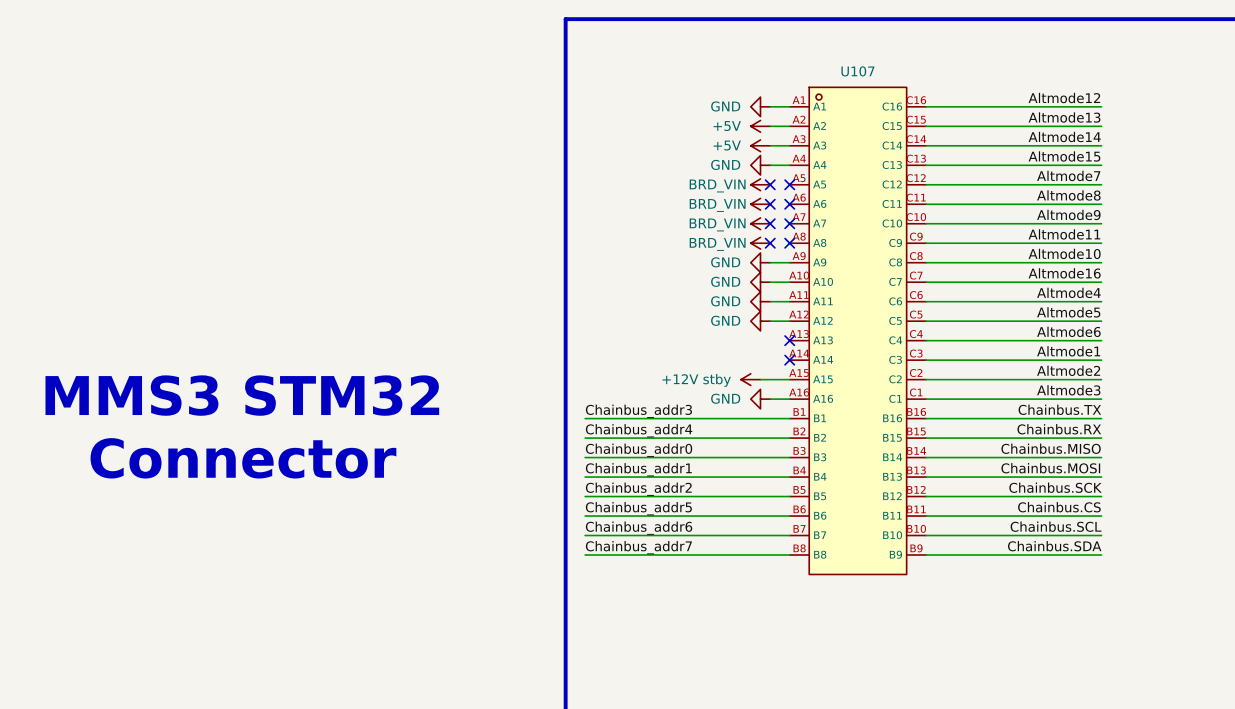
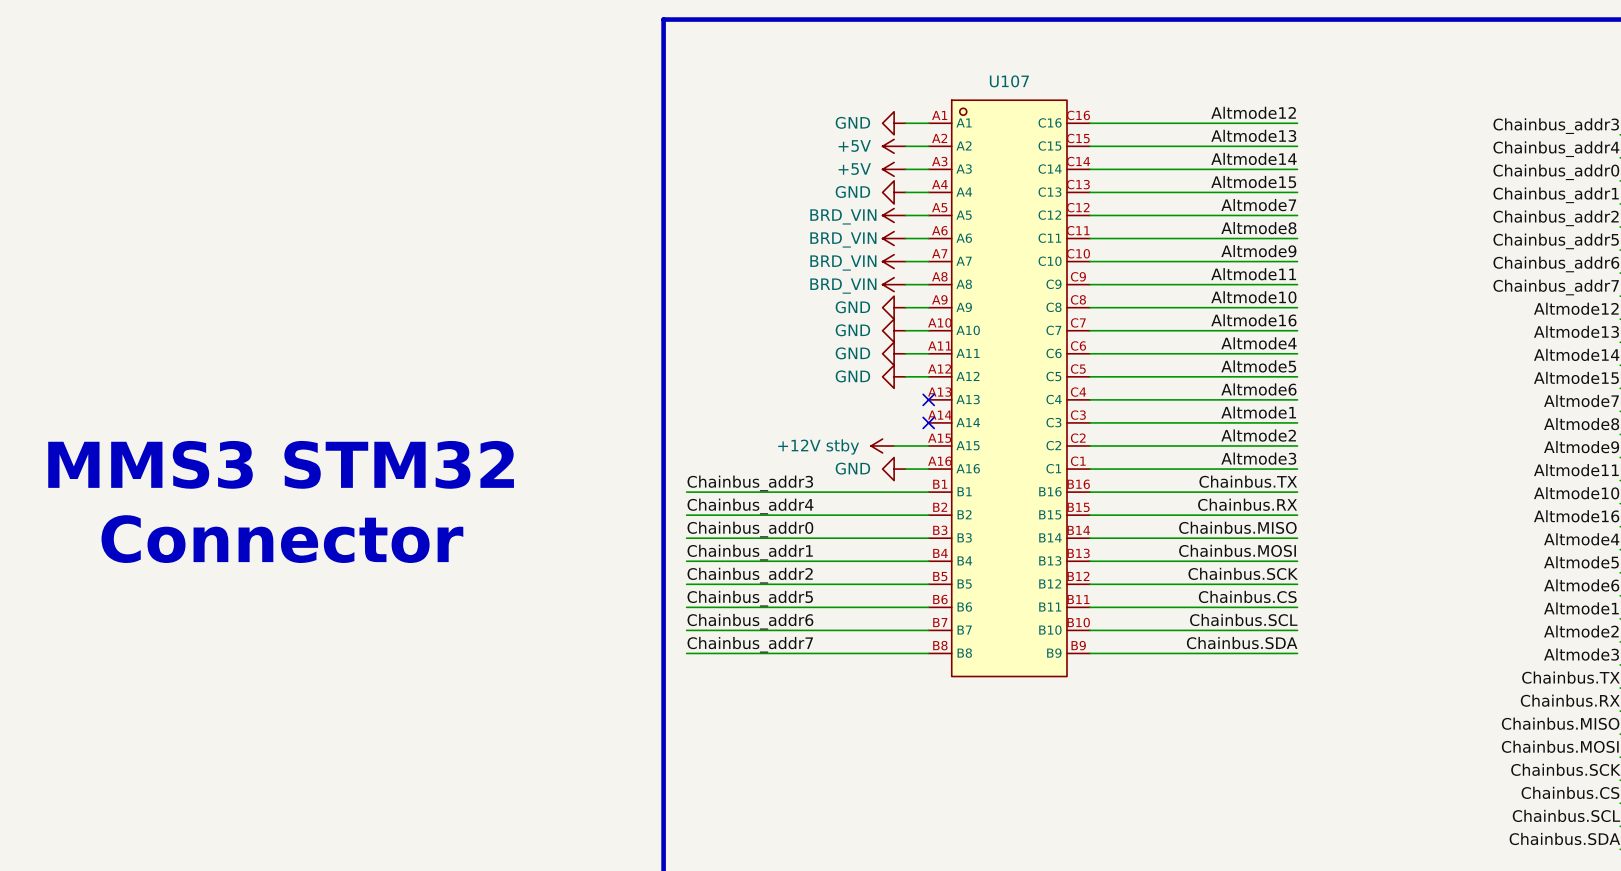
wire: none -> (905, 215) (928, 215)
no-connect mark: (770, 184) -> none
no-connect mark: (789, 184) -> none
wire: none -> (905, 238) (928, 238)
no-connect mark: (770, 204) -> none
no-connect mark: (789, 204) -> none
wire: none -> (905, 261) (928, 261)
no-connect mark: (770, 223) -> none
no-connect mark: (789, 223) -> none
wire: none -> (905, 284) (928, 284)
no-connect mark: (770, 243) -> none
no-connect mark: (789, 243) -> none

